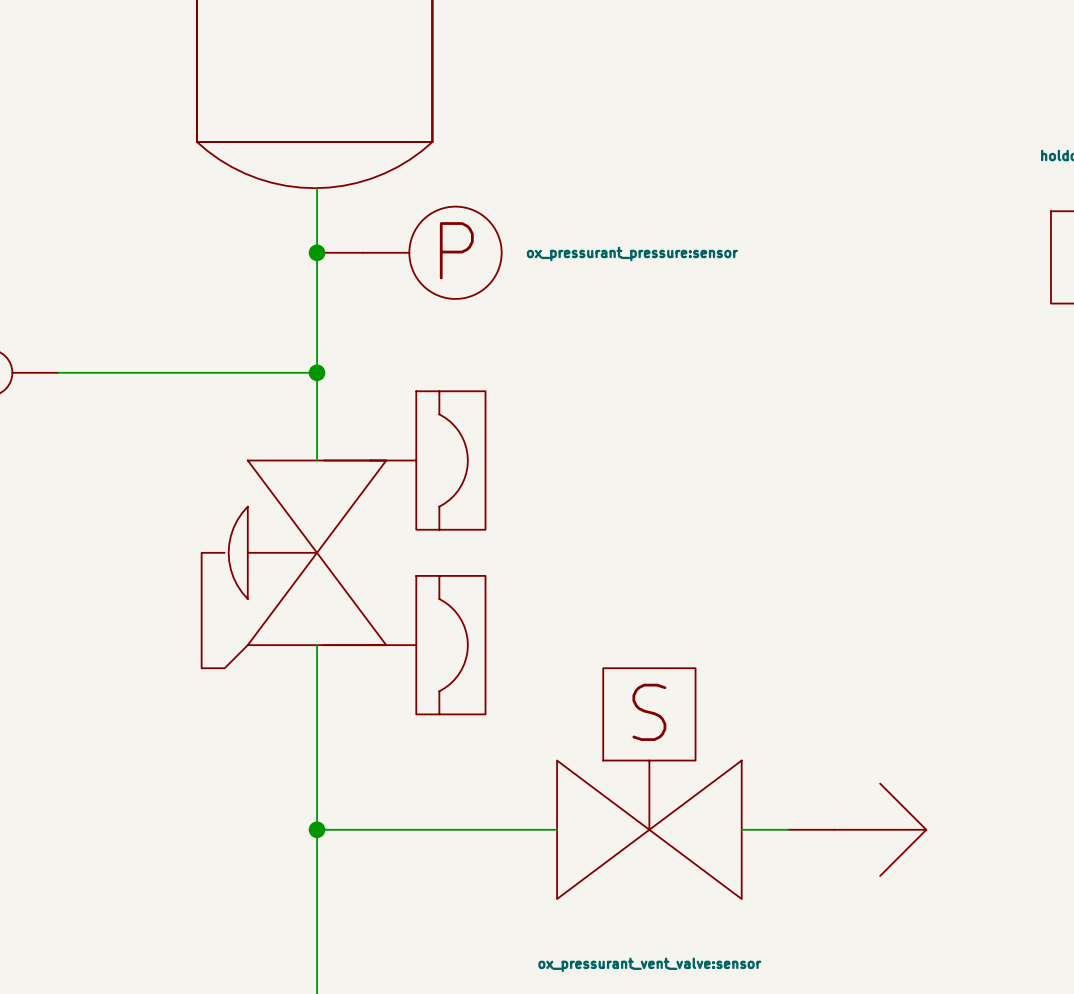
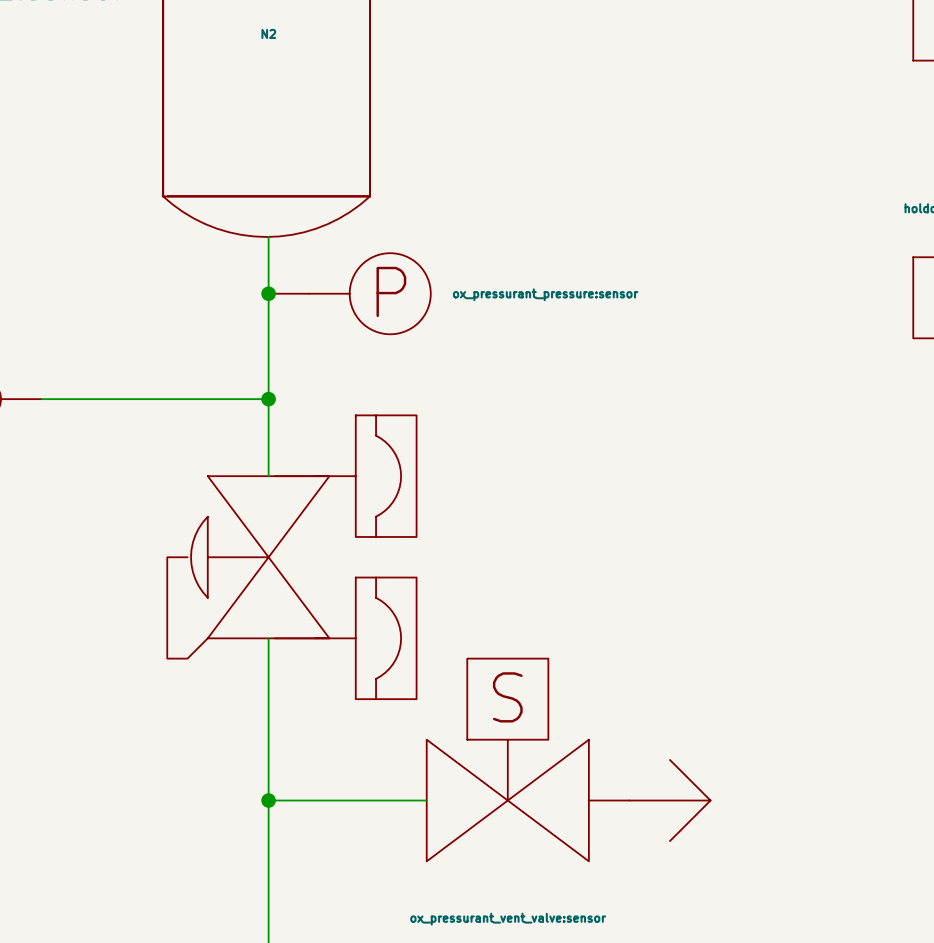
part position: (649, 783) -> (507, 759)
wire: (497, 829) (557, 829) -> none
part position: (857, 829) -> (649, 800)

